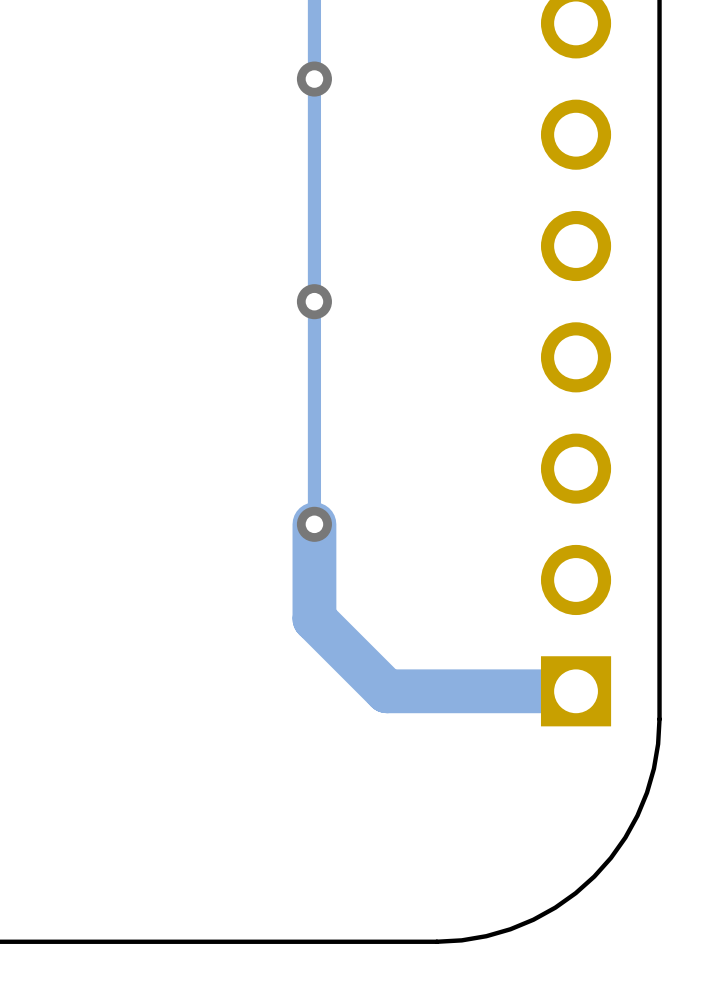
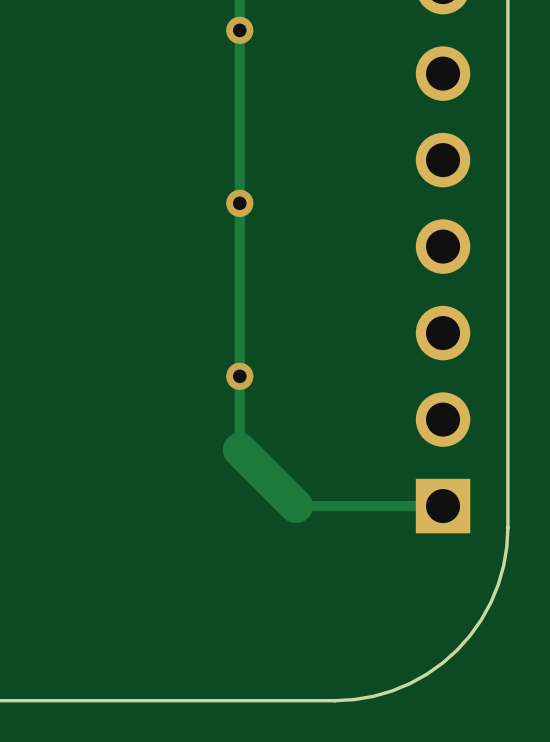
track width: thick (314, 524) (314, 618) -> thin (239, 376) (239, 449)
track width: thick (576, 691) (386, 691) -> thin (443, 506) (296, 506)

